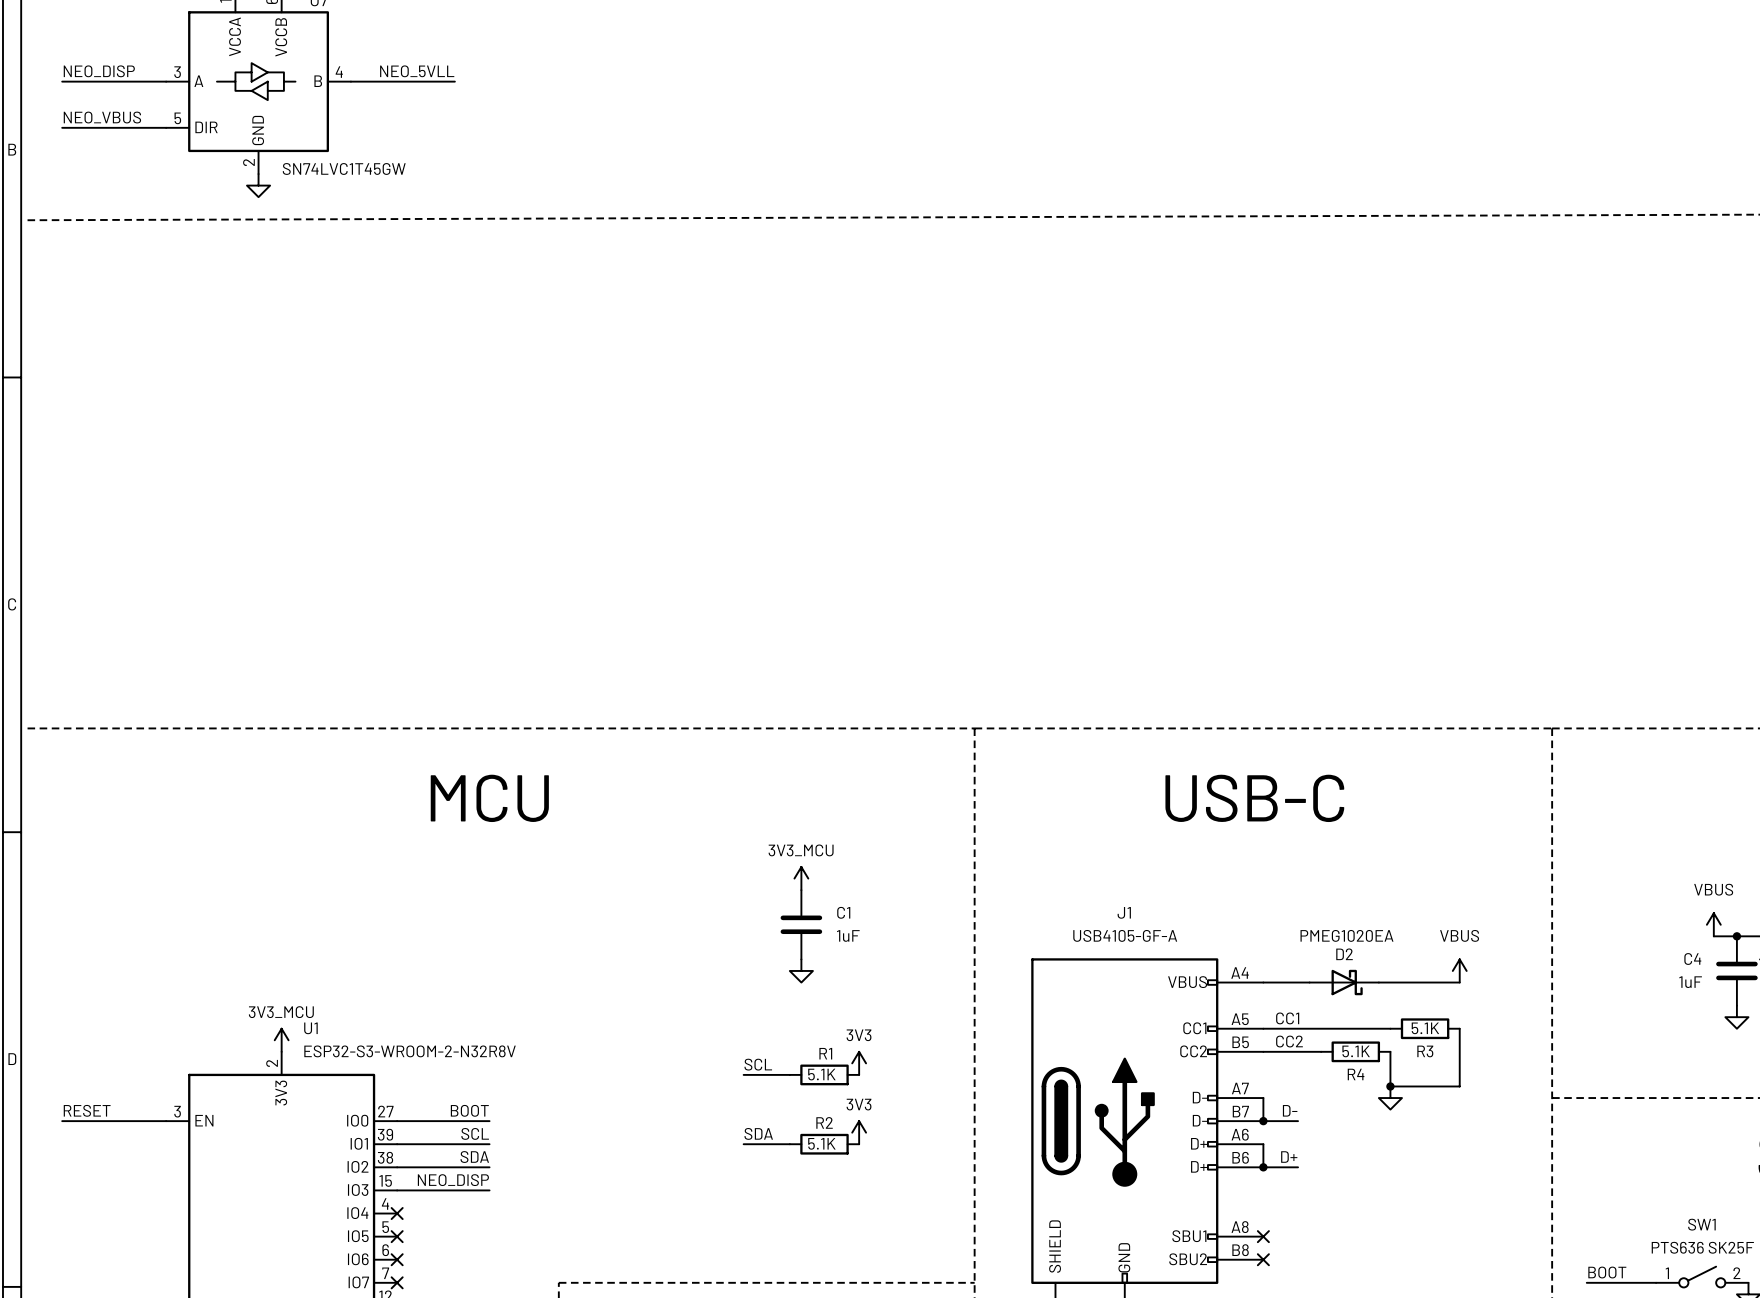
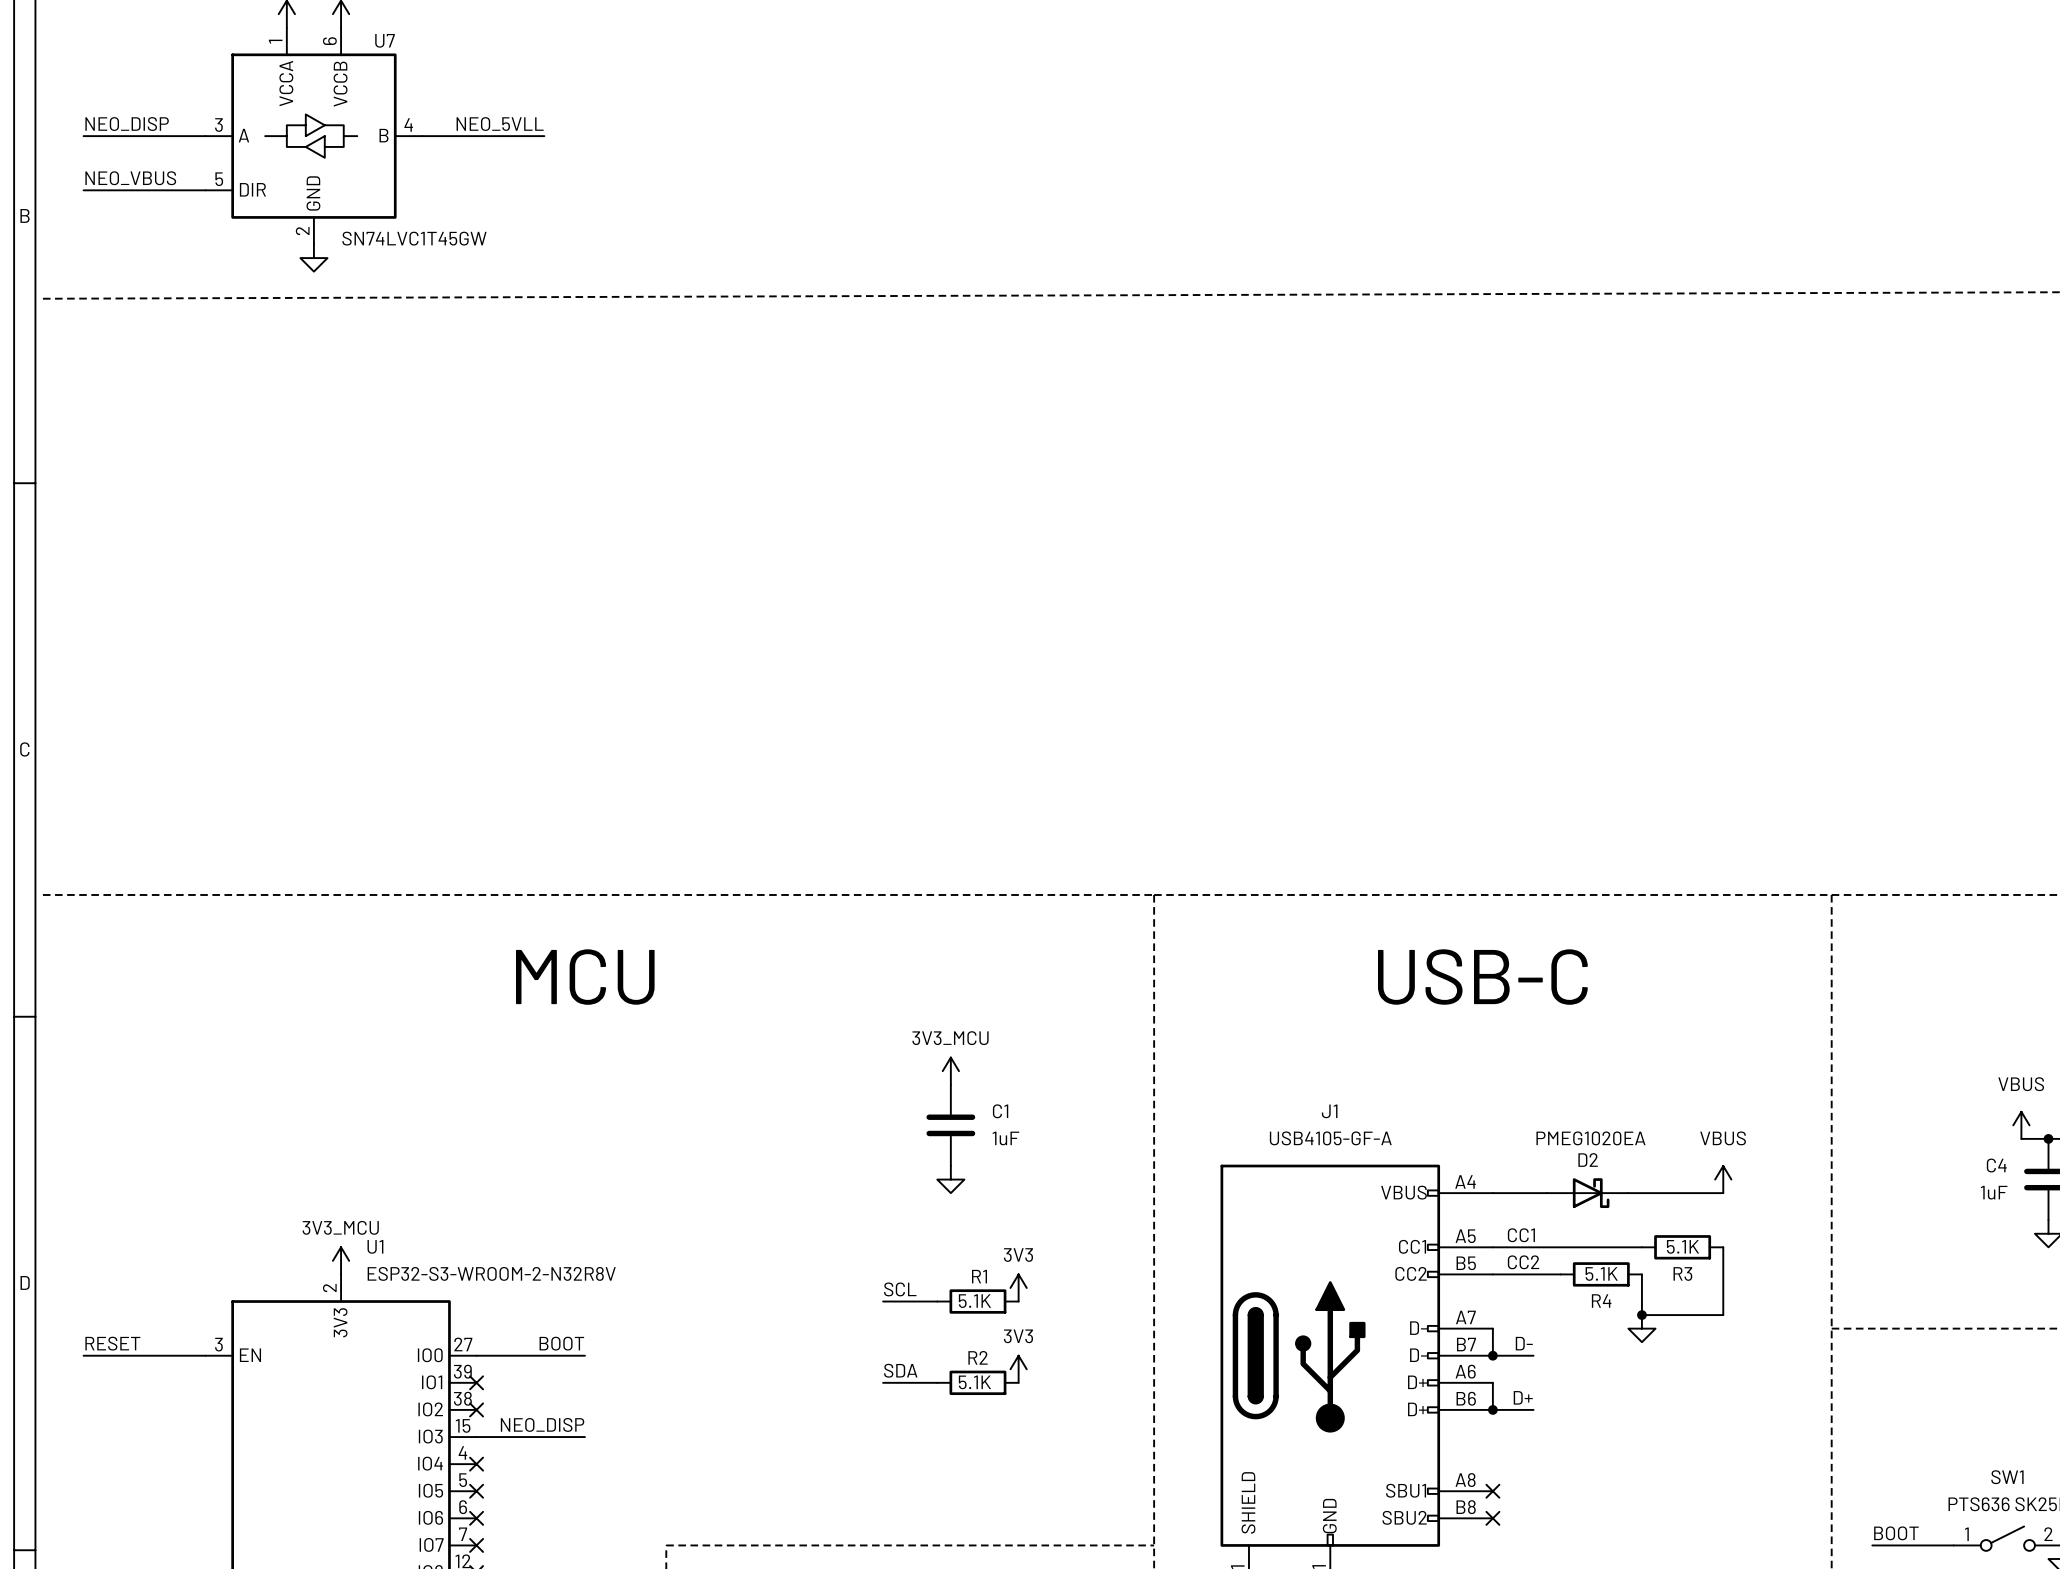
label: SCL (475, 1133) -> none
wire: (397, 1144) (489, 1144) -> none
no-connect mark: none -> (476, 1382)
label: SDA (474, 1157) -> none
wire: (397, 1167) (489, 1167) -> none
no-connect mark: none -> (476, 1409)

